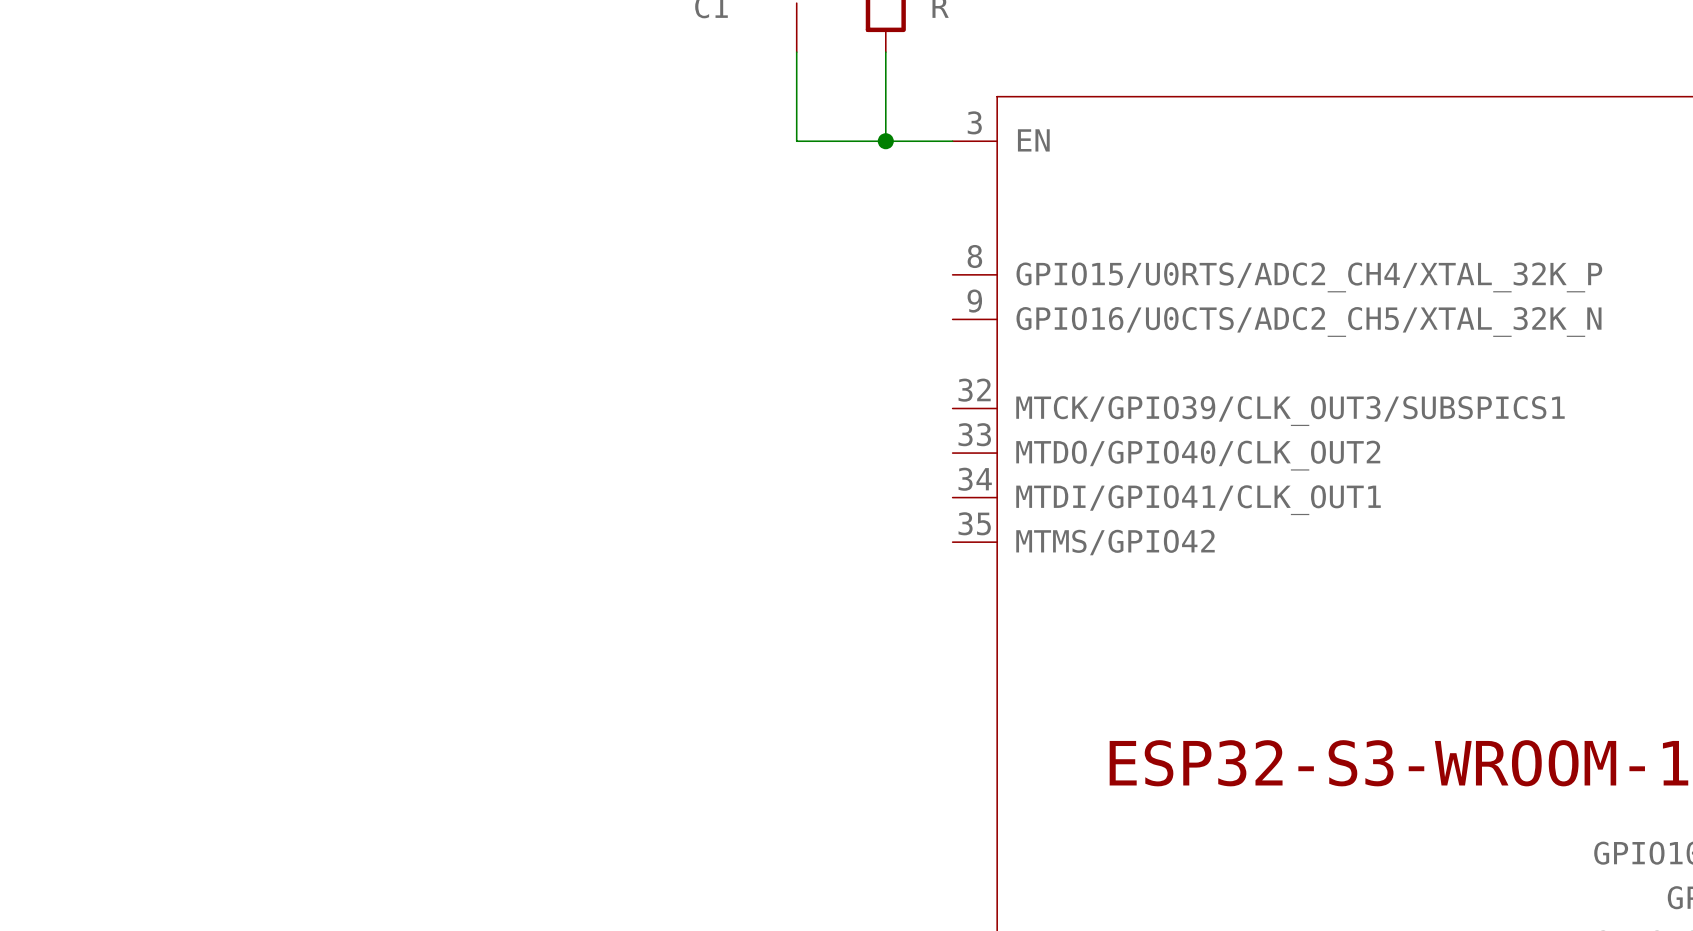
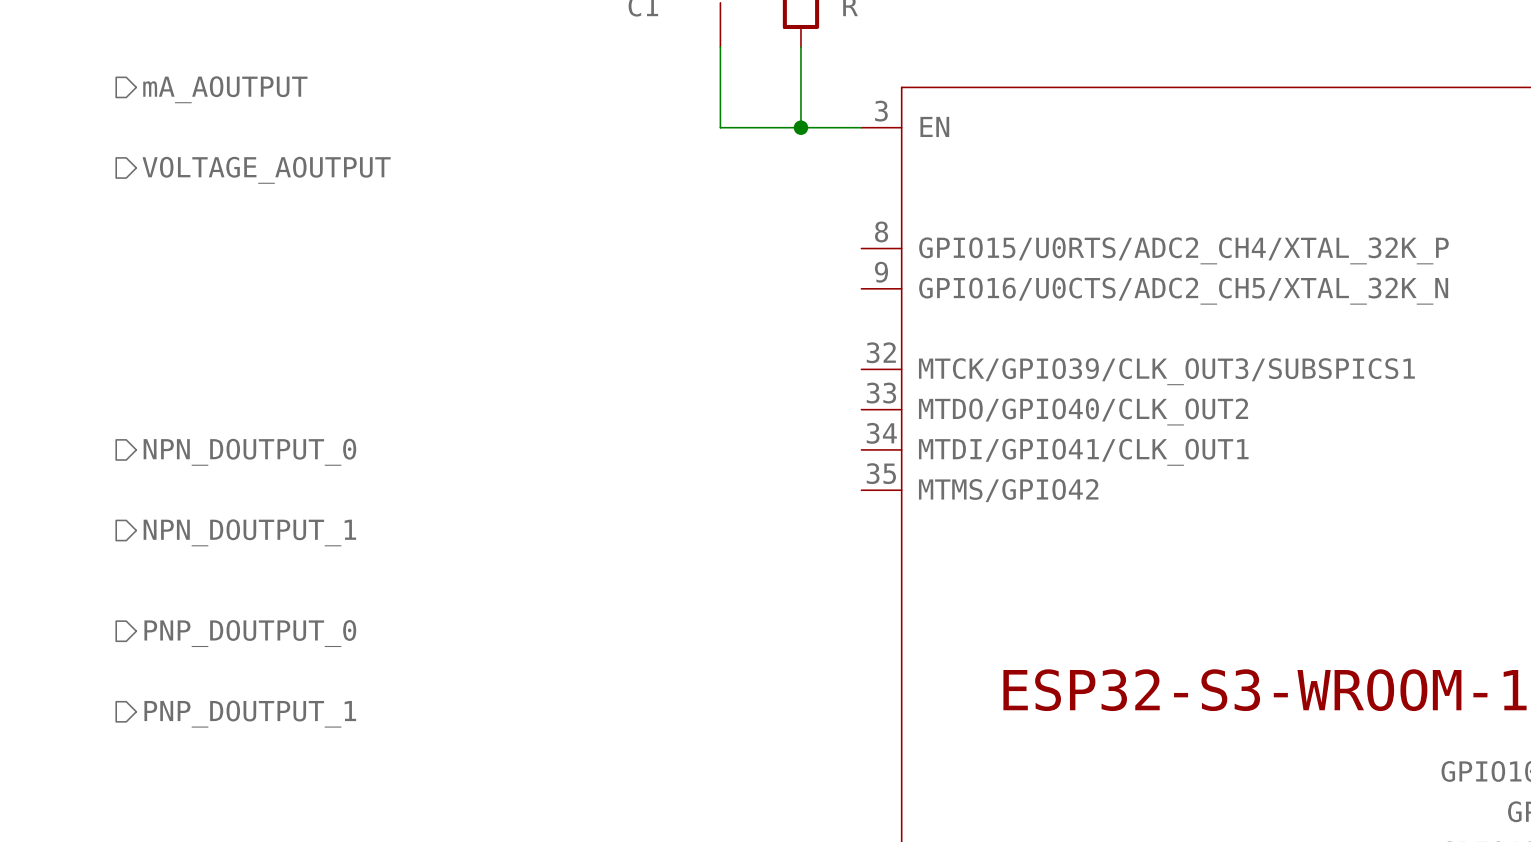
hierarchical label: none -> mA_AOUTPUT (225, 89)
hierarchical label: none -> VOLTAGE_AOUTPUT (266, 170)
hierarchical label: none -> NPN_DOUTPUT_0 (249, 452)
hierarchical label: none -> NPN_DOUTPUT_1 (249, 532)
hierarchical label: none -> PNP_DOUTPUT_0 (250, 633)
hierarchical label: none -> PNP_DOUTPUT_1 (250, 714)

